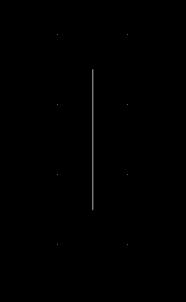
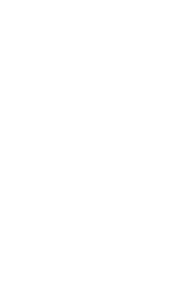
bus: (92, 69) (92, 209) -> none

